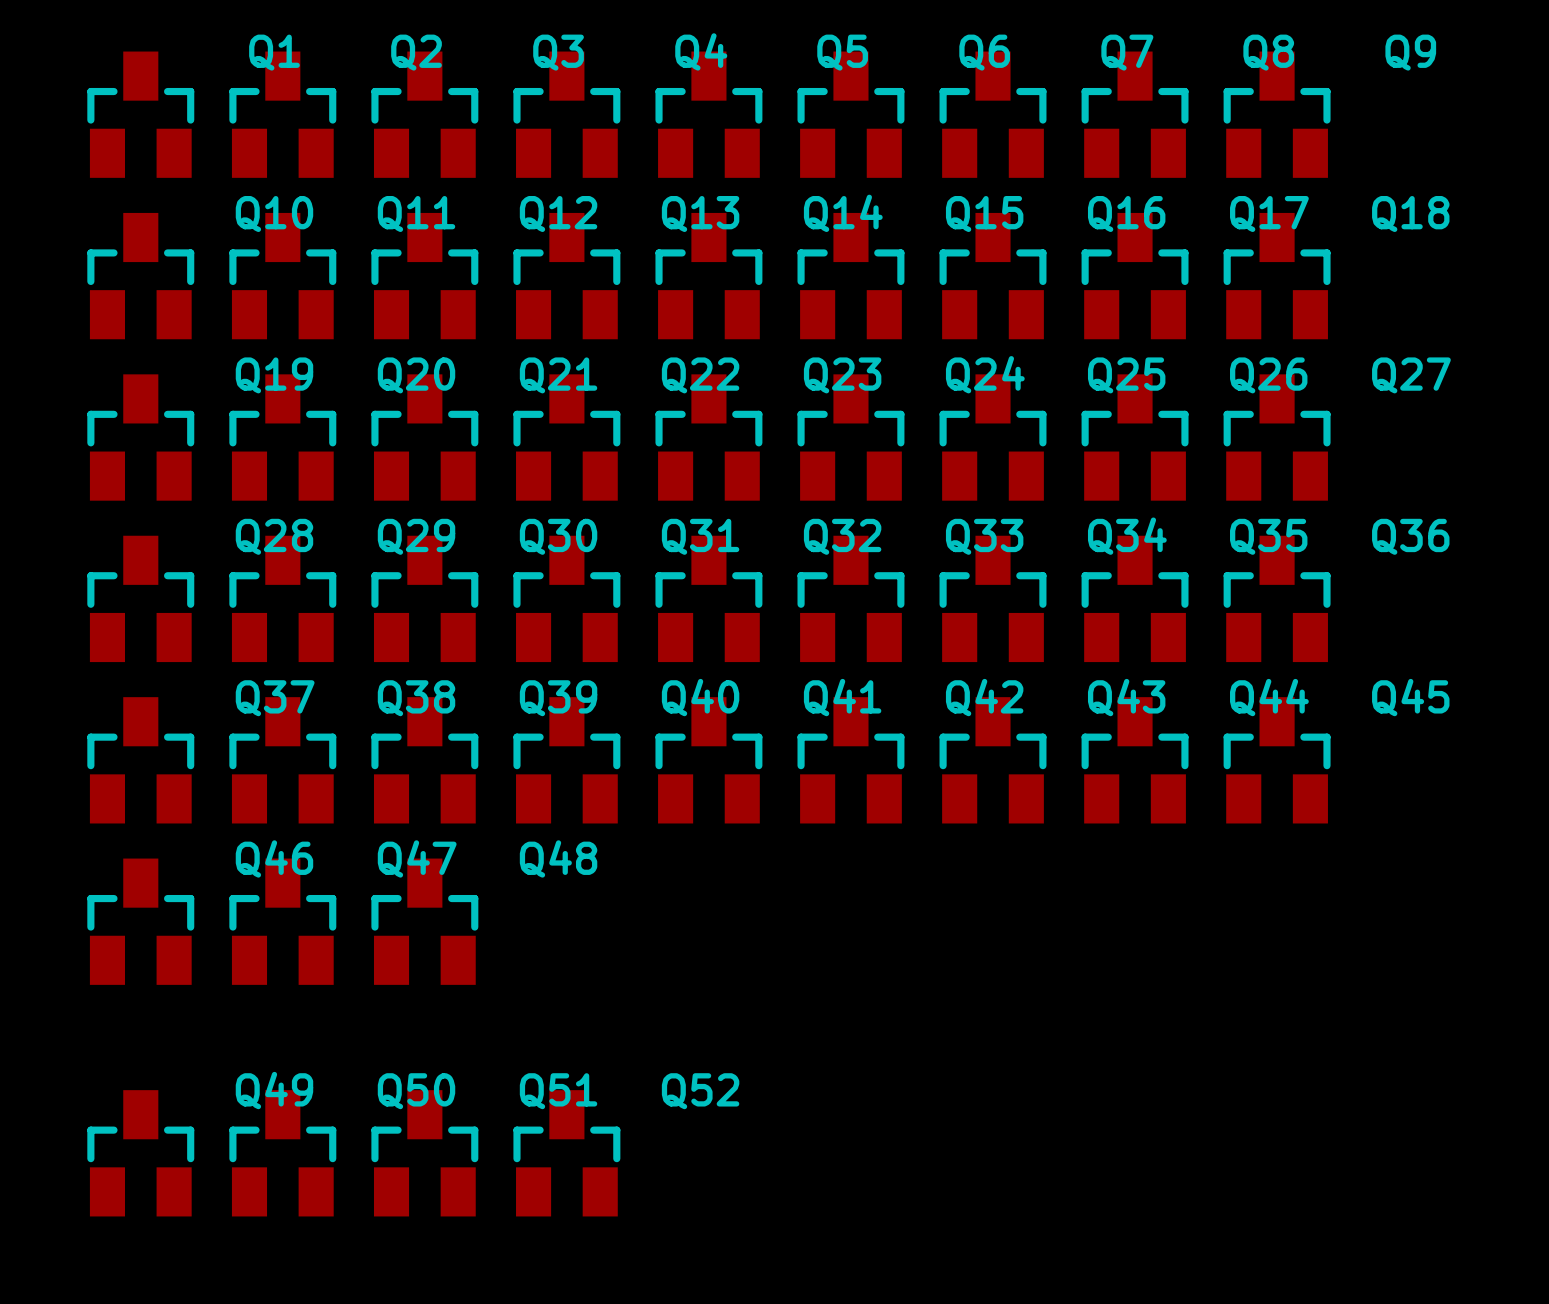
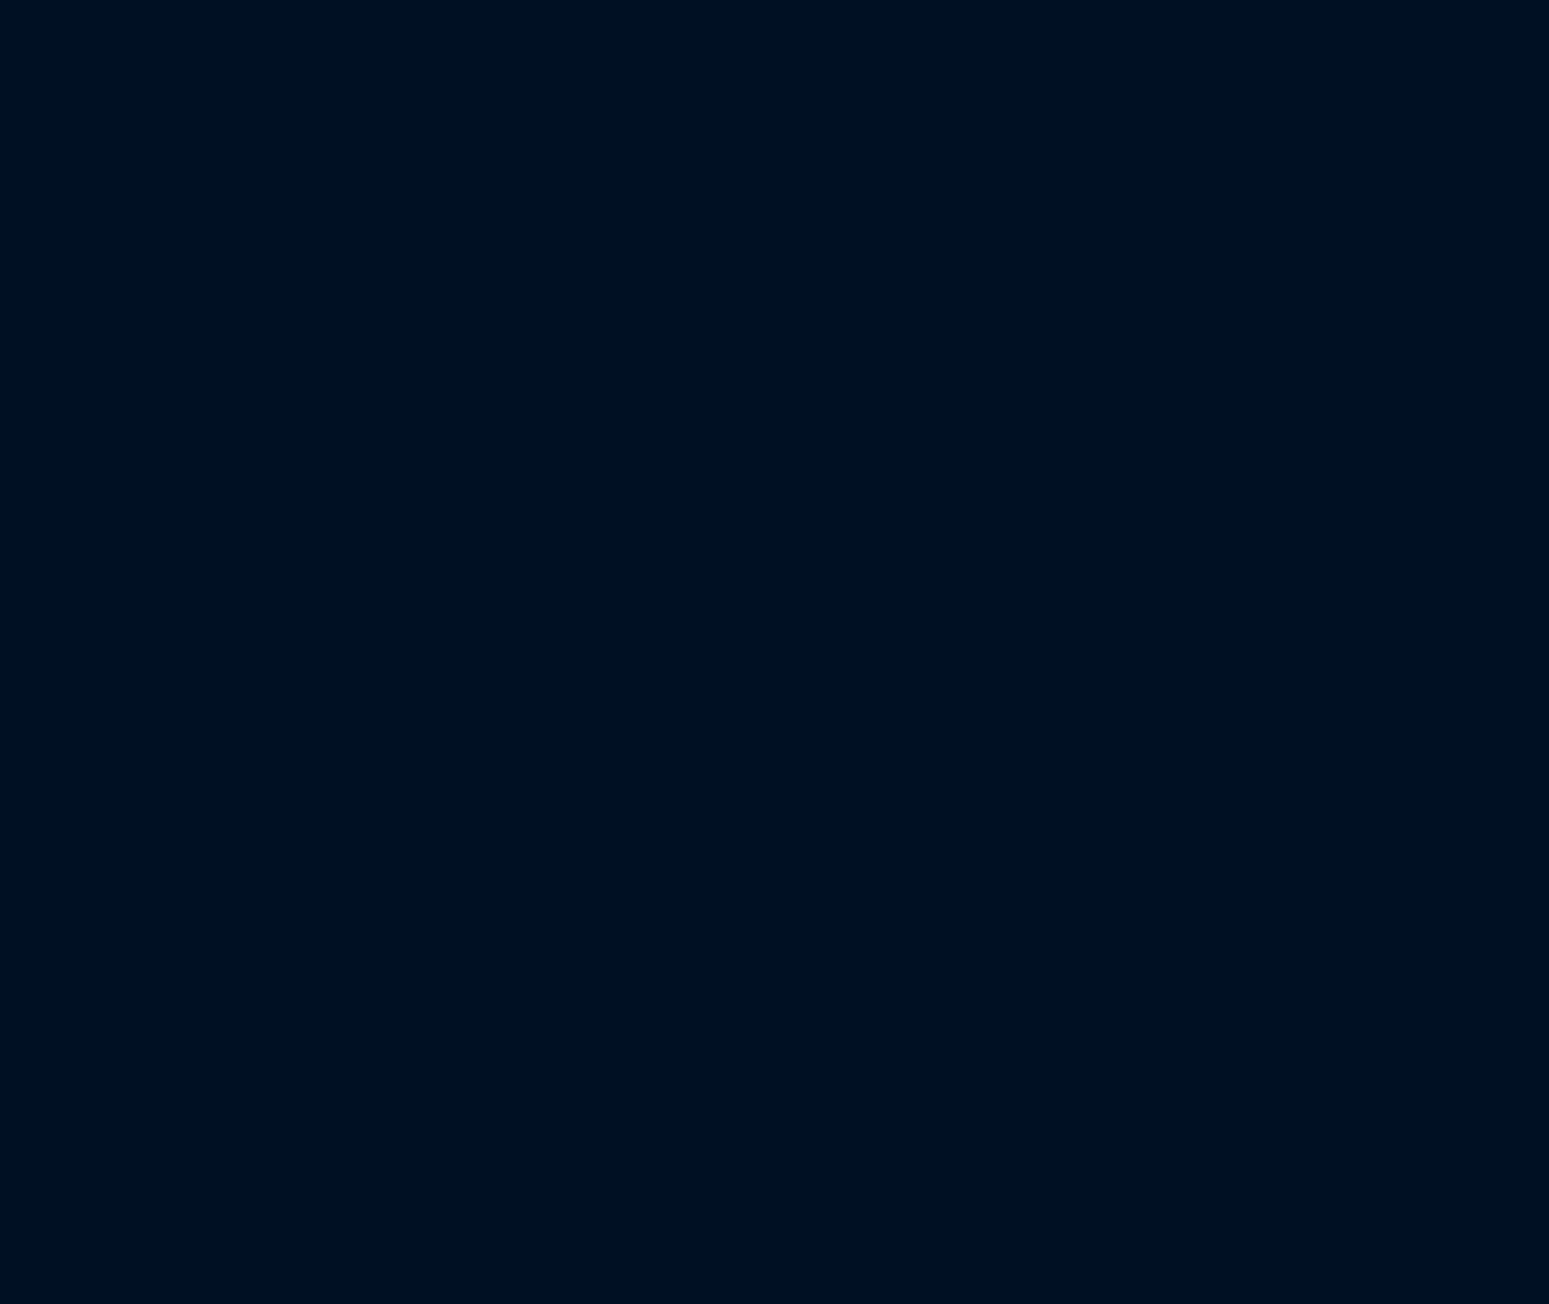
Q1: (140, 114) -> none
Q2: (282, 114) -> none
Q3: (424, 114) -> none
Q4: (566, 114) -> none
Q5: (708, 114) -> none
Q6: (850, 114) -> none
Q7: (993, 114) -> none
Q8: (1135, 114) -> none
Q9: (1277, 114) -> none
Q10: (140, 276) -> none
Q11: (282, 276) -> none
Q12: (424, 276) -> none
Q13: (566, 276) -> none
Q14: (708, 276) -> none
Q15: (850, 276) -> none
Q16: (993, 276) -> none
Q17: (1135, 276) -> none
Q18: (1277, 276) -> none
Q19: (140, 437) -> none
Q20: (282, 437) -> none
Q21: (424, 437) -> none
Q22: (566, 437) -> none
Q23: (708, 437) -> none
Q24: (850, 437) -> none
Q25: (993, 437) -> none
Q26: (1135, 437) -> none
Q27: (1277, 437) -> none
Q28: (140, 598) -> none
Q29: (282, 598) -> none
Q30: (424, 598) -> none
Q31: (566, 598) -> none
Q32: (708, 598) -> none
Q33: (850, 598) -> none
Q34: (993, 598) -> none
Q35: (1135, 598) -> none
Q36: (1277, 598) -> none
Q37: (140, 760) -> none
Q38: (282, 760) -> none
Q39: (424, 760) -> none
Q40: (566, 760) -> none
Q41: (708, 760) -> none
Q42: (850, 760) -> none
Q43: (993, 760) -> none
Q44: (1135, 760) -> none
Q45: (1277, 760) -> none
Q46: (140, 921) -> none
Q47: (282, 921) -> none
Q48: (424, 921) -> none
Q49: (140, 1153) -> none
Q50: (282, 1153) -> none
Q51: (424, 1153) -> none
Q52: (566, 1153) -> none

